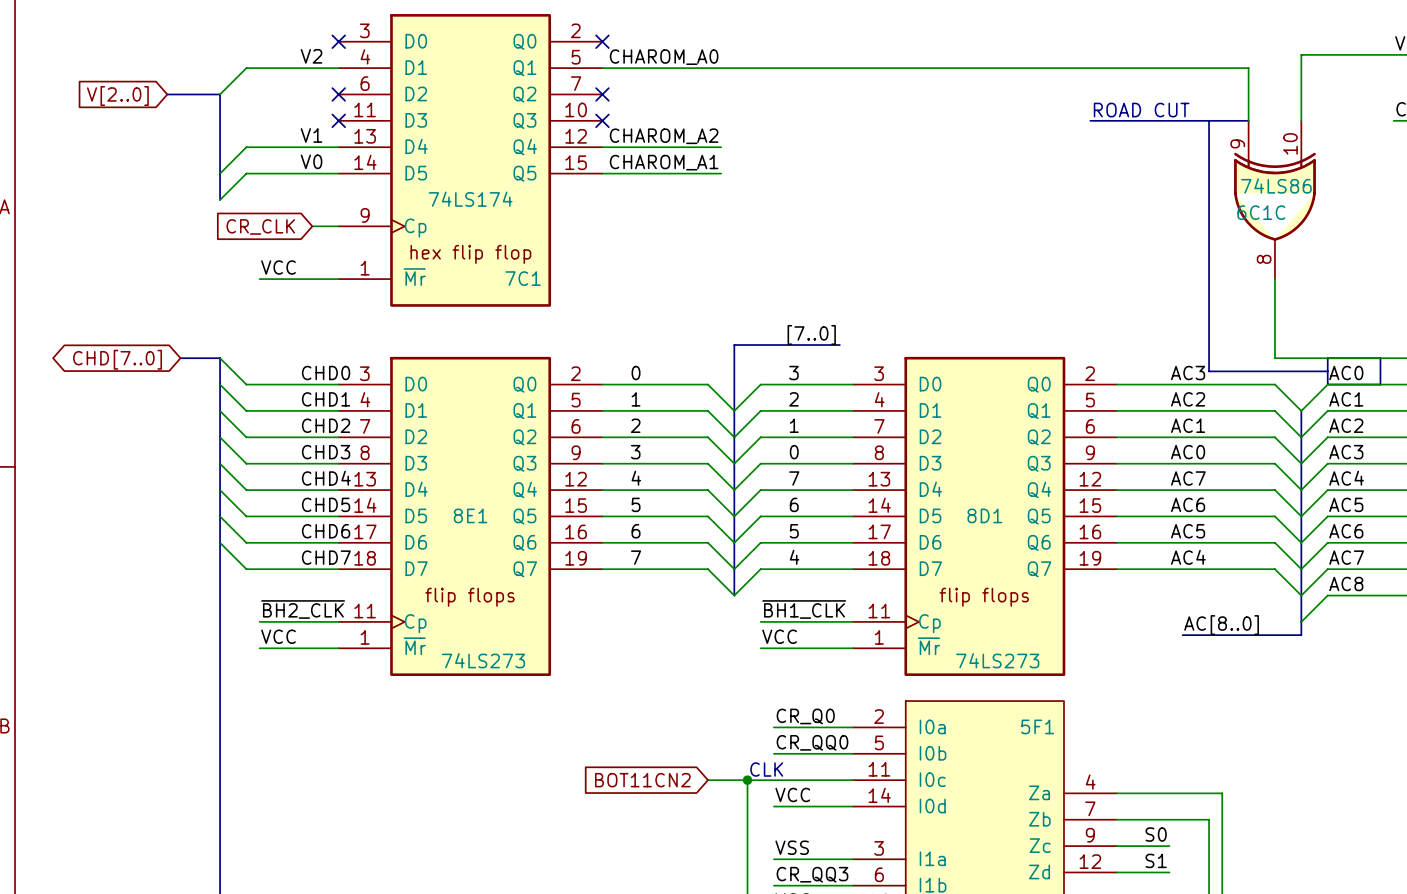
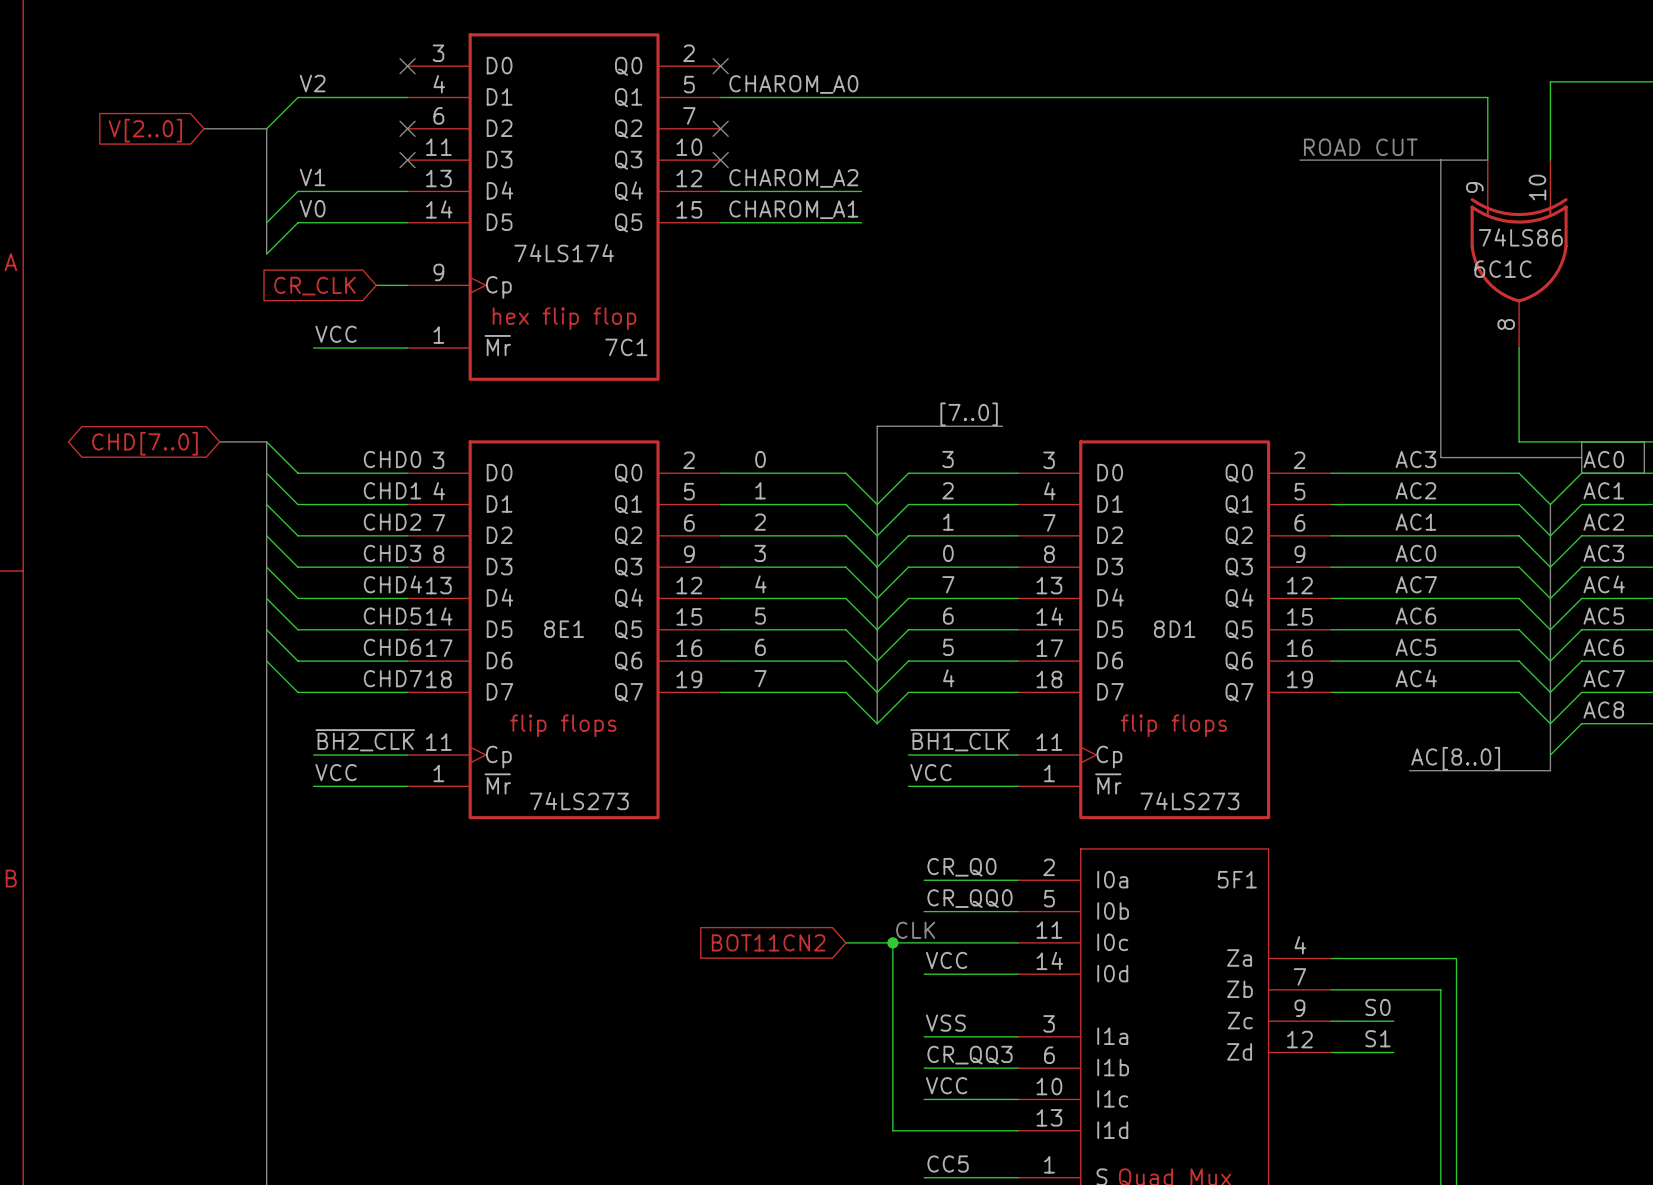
label position: V2 (311, 56) -> V2 (312, 83)
label position: V1 (311, 135) -> V1 (312, 177)
label position: V0 (311, 161) -> V0 (312, 208)

